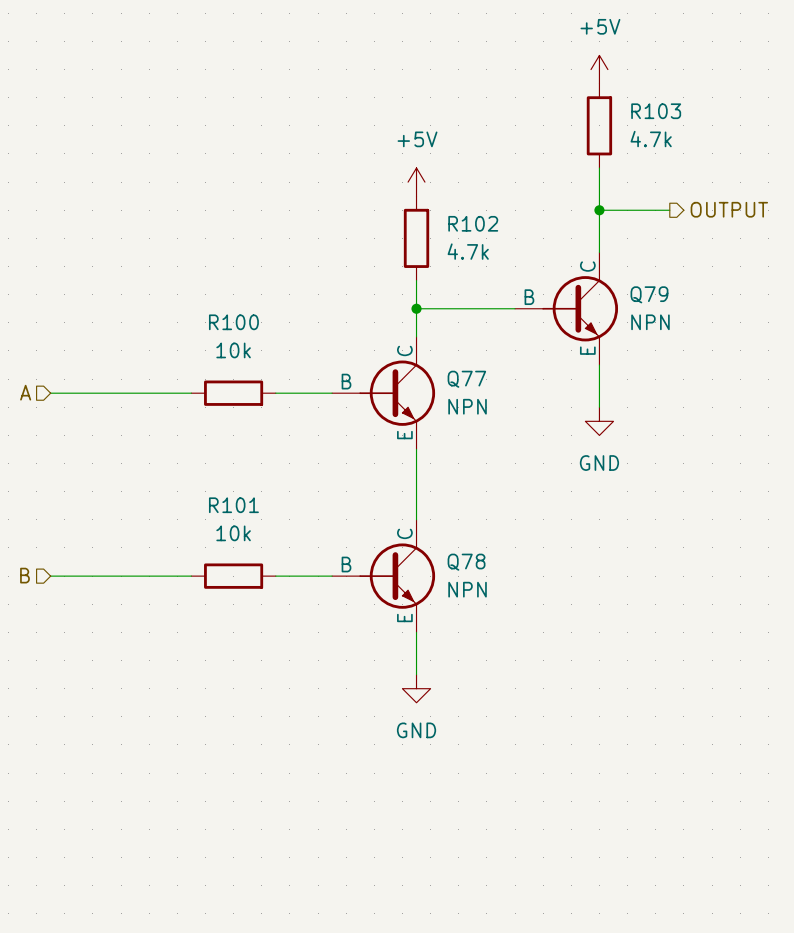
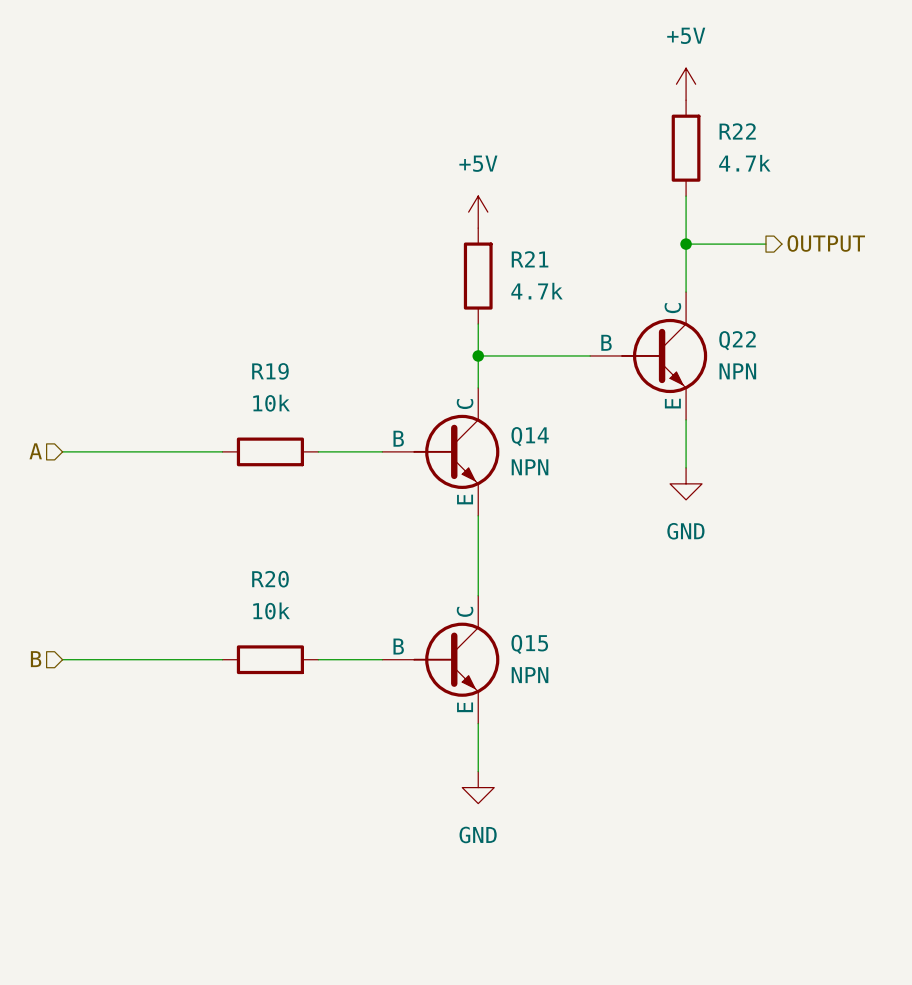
R103 name: R103 (656, 111) -> R22 (737, 131)
R102 name: R102 (473, 223) -> R21 (530, 259)
Q79 name: Q79 (649, 294) -> Q22 (737, 340)
R100 name: R100 (233, 322) -> R19 (270, 371)
Q77 name: Q77 (466, 379) -> Q14 (530, 436)
R101 name: R101 (233, 505) -> R20 (270, 579)
Q78 name: Q78 (466, 562) -> Q15 (529, 644)

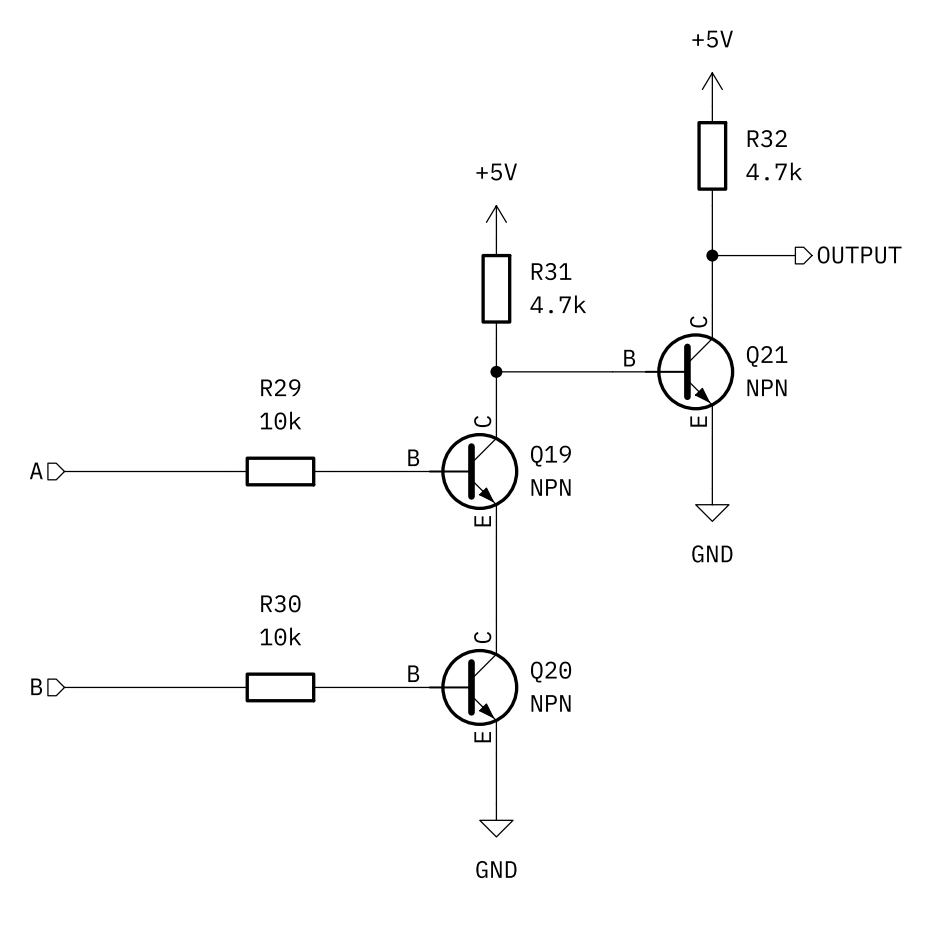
R22 name: R22 (737, 131) -> R32 (767, 138)
R21 name: R21 (530, 259) -> R31 (551, 271)
Q22 name: Q22 (737, 340) -> Q21 (767, 356)
R19 name: R19 (270, 371) -> R29 (280, 387)
Q14 name: Q14 (530, 436) -> Q19 (550, 456)
R20 name: R20 (270, 579) -> R30 (280, 603)
Q15 name: Q15 (529, 644) -> Q20 (551, 672)

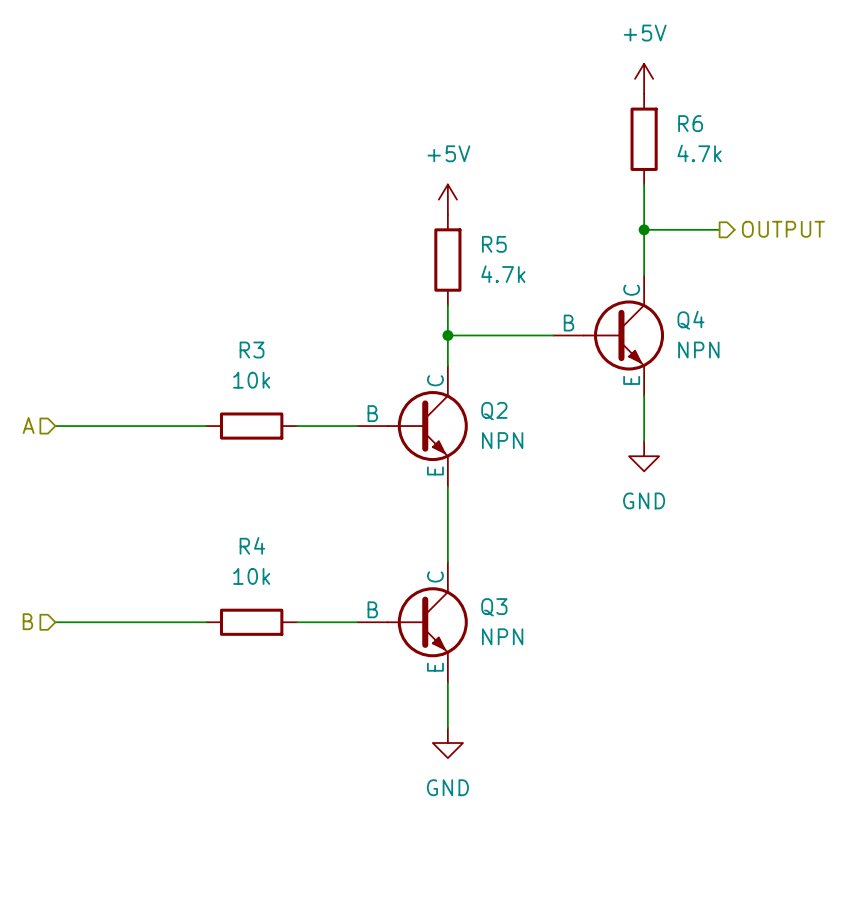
R32 name: R32 (767, 138) -> R6 (690, 123)
R31 name: R31 (551, 271) -> R5 (494, 244)
Q21 name: Q21 (767, 356) -> Q4 (690, 320)
R29 name: R29 (280, 387) -> R3 (252, 350)
Q19 name: Q19 (550, 456) -> Q2 (494, 411)
R30 name: R30 (280, 603) -> R4 (252, 545)
Q20 name: Q20 (551, 672) -> Q3 (494, 607)

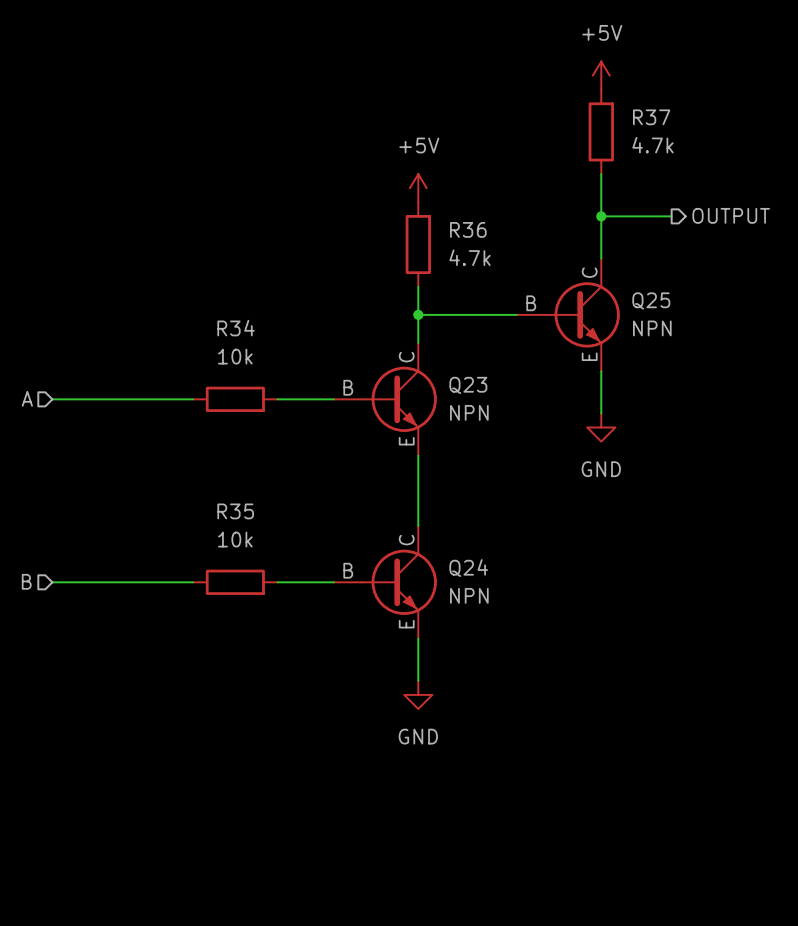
R6 name: R6 (690, 123) -> R37 (651, 117)
R5 name: R5 (494, 244) -> R36 (468, 229)
Q4 name: Q4 (690, 320) -> Q25 (651, 300)
R3 name: R3 (252, 350) -> R34 (236, 328)
Q2 name: Q2 (494, 411) -> Q23 (468, 385)
R4 name: R4 (252, 545) -> R35 (235, 511)
Q3 name: Q3 (494, 607) -> Q24 (468, 568)

